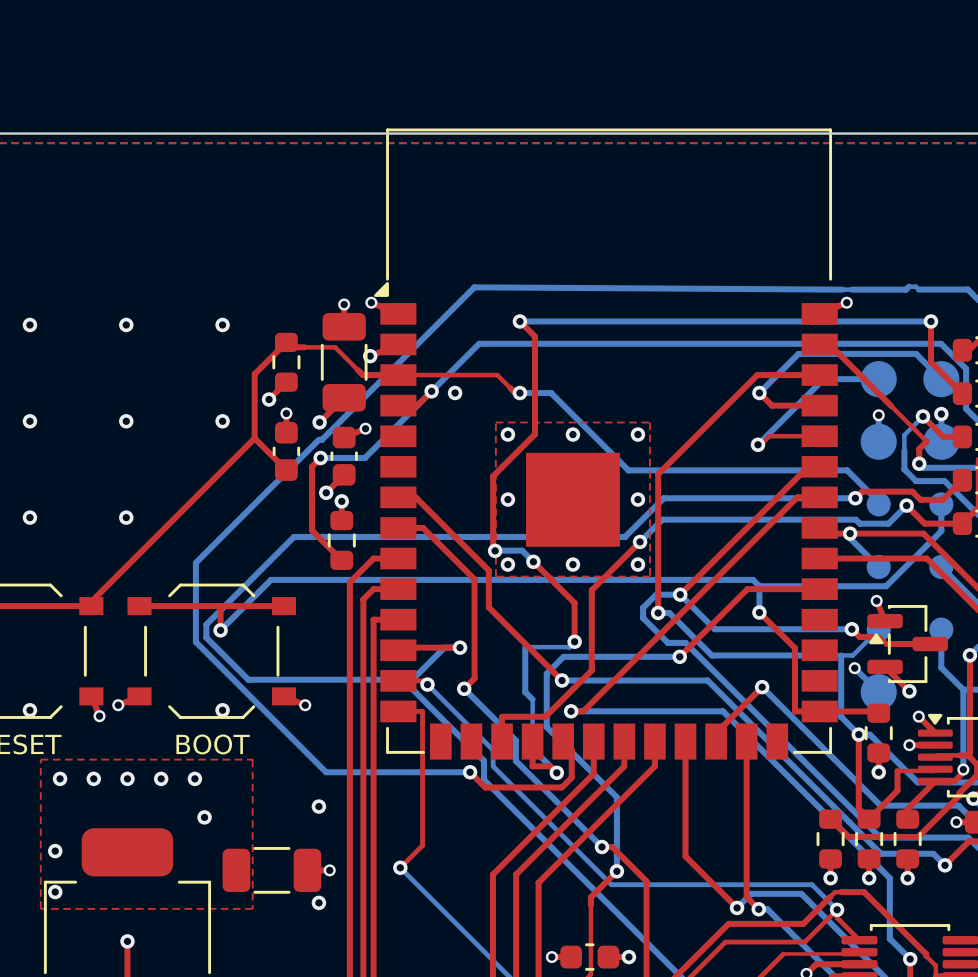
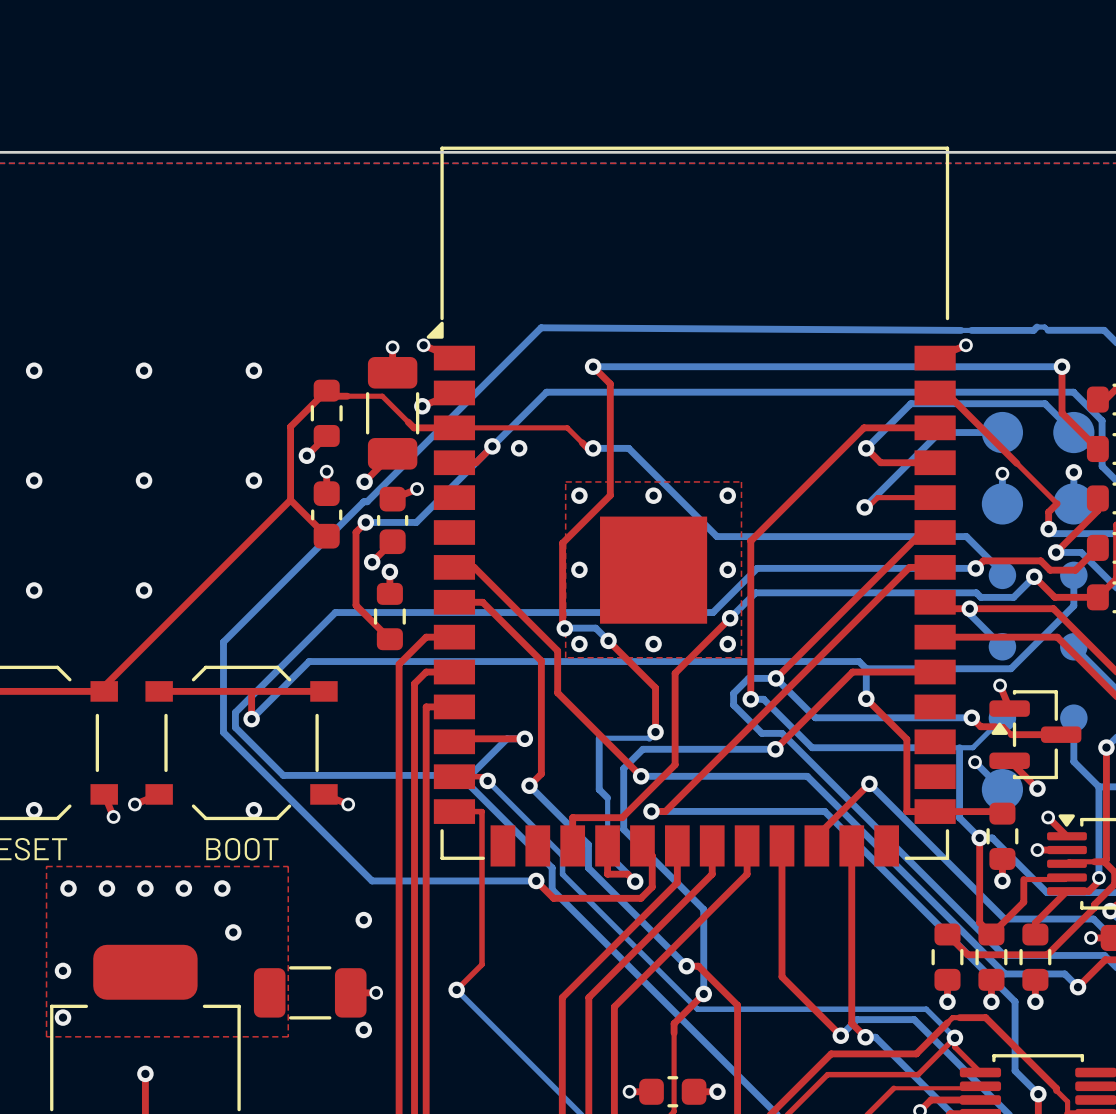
top track: (922, 416) (943, 436) (962, 436) -> (1056, 552) (1097, 510) (1097, 498)
bottom track: (922, 416) (904, 435) (904, 469) (916, 481) (944, 481) (947, 484) -> (1056, 552) (1081, 552)
via position: (922, 416) -> (1056, 552)

